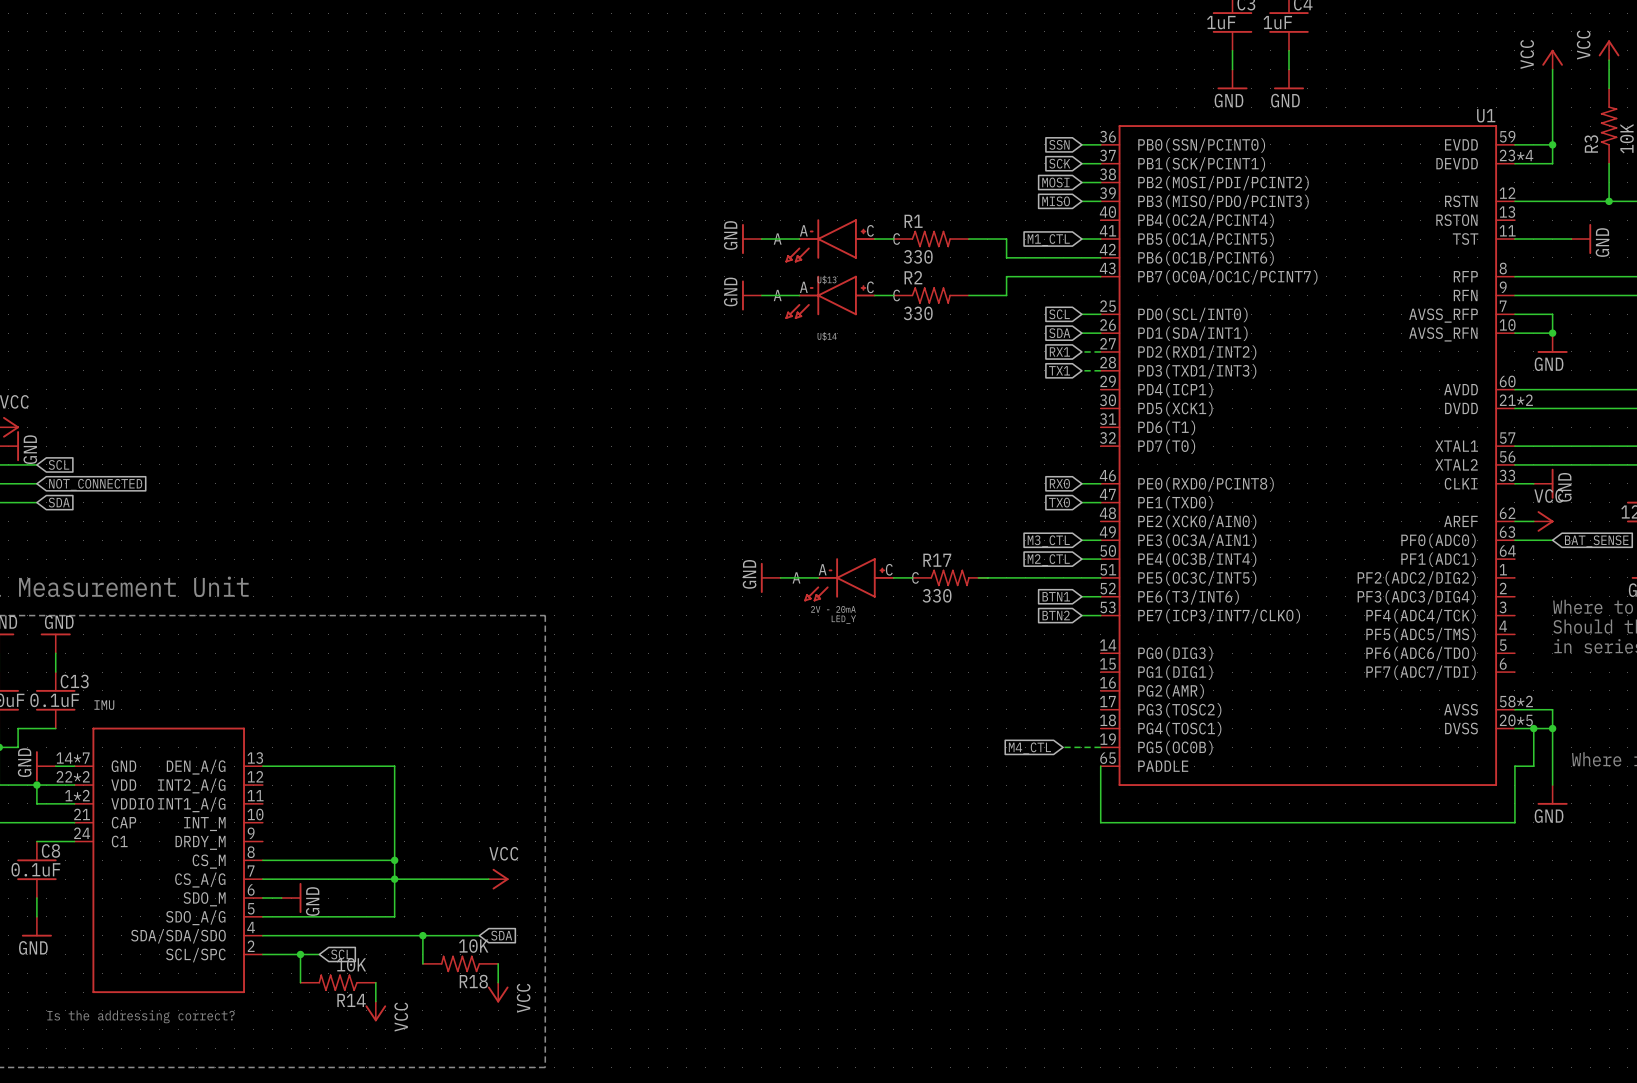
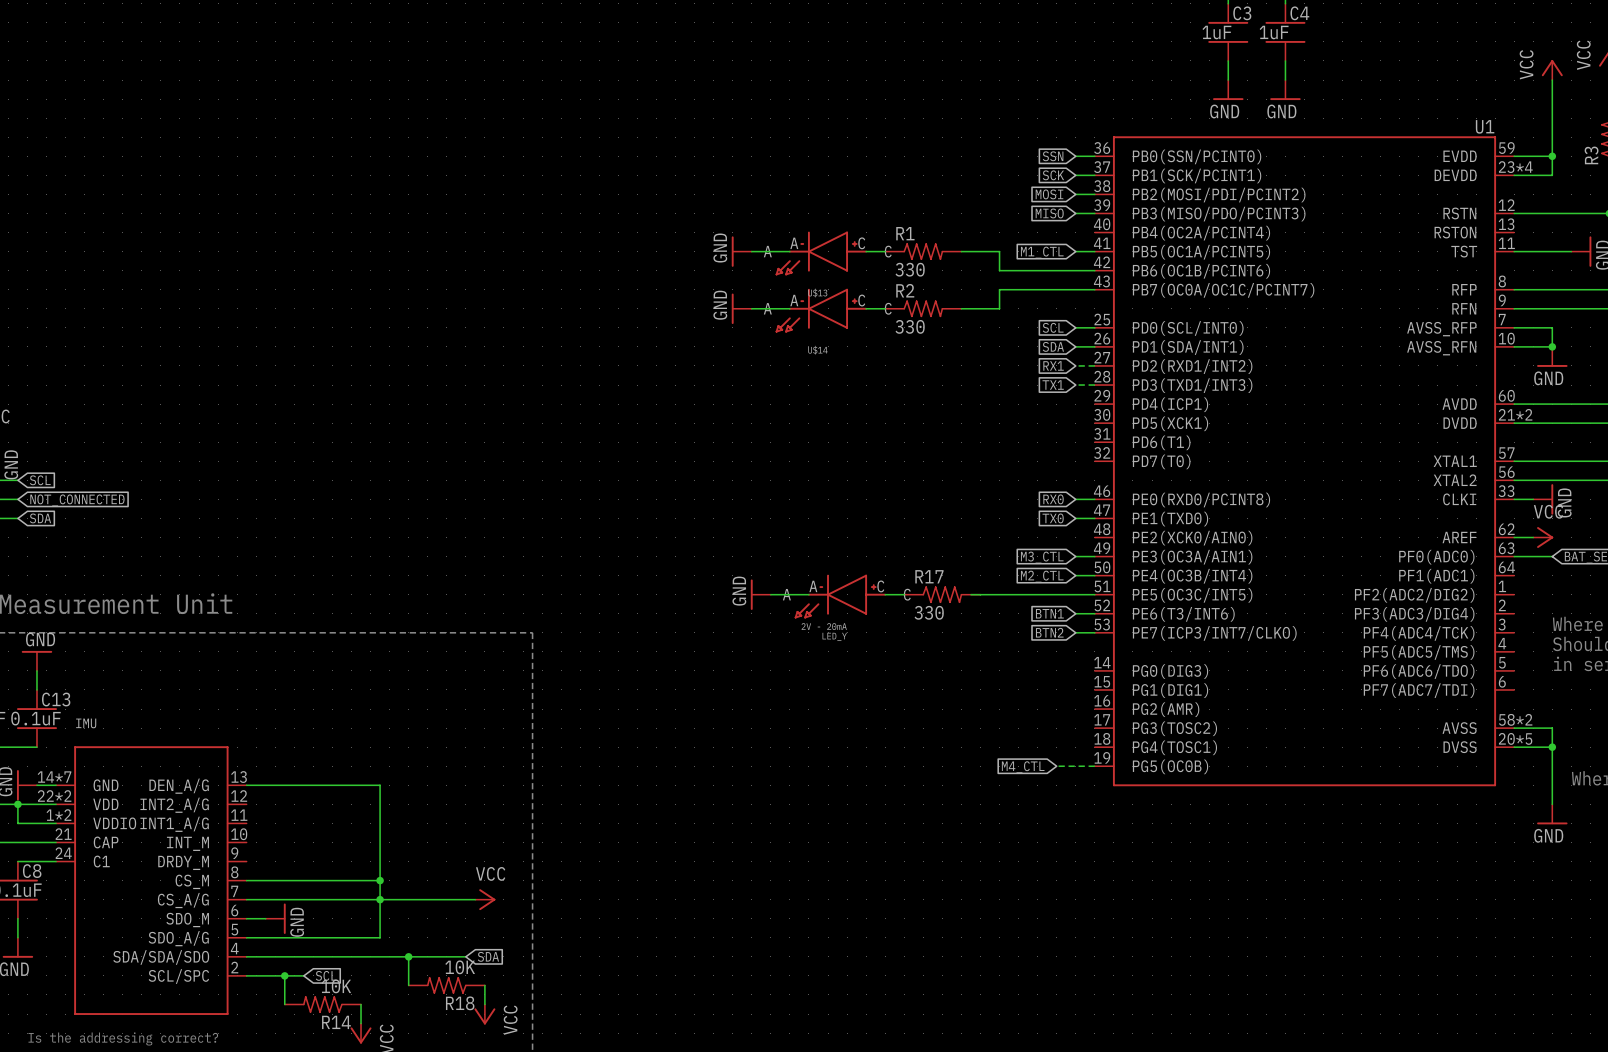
U1 symbol: [1100, 125, 1515, 786] -> [1094, 136, 1515, 787]
wire: (1533, 728) (1533, 766) (1514, 766) (1514, 822) (1100, 822) (1100, 766) -> none
junction: (1533, 728) -> none

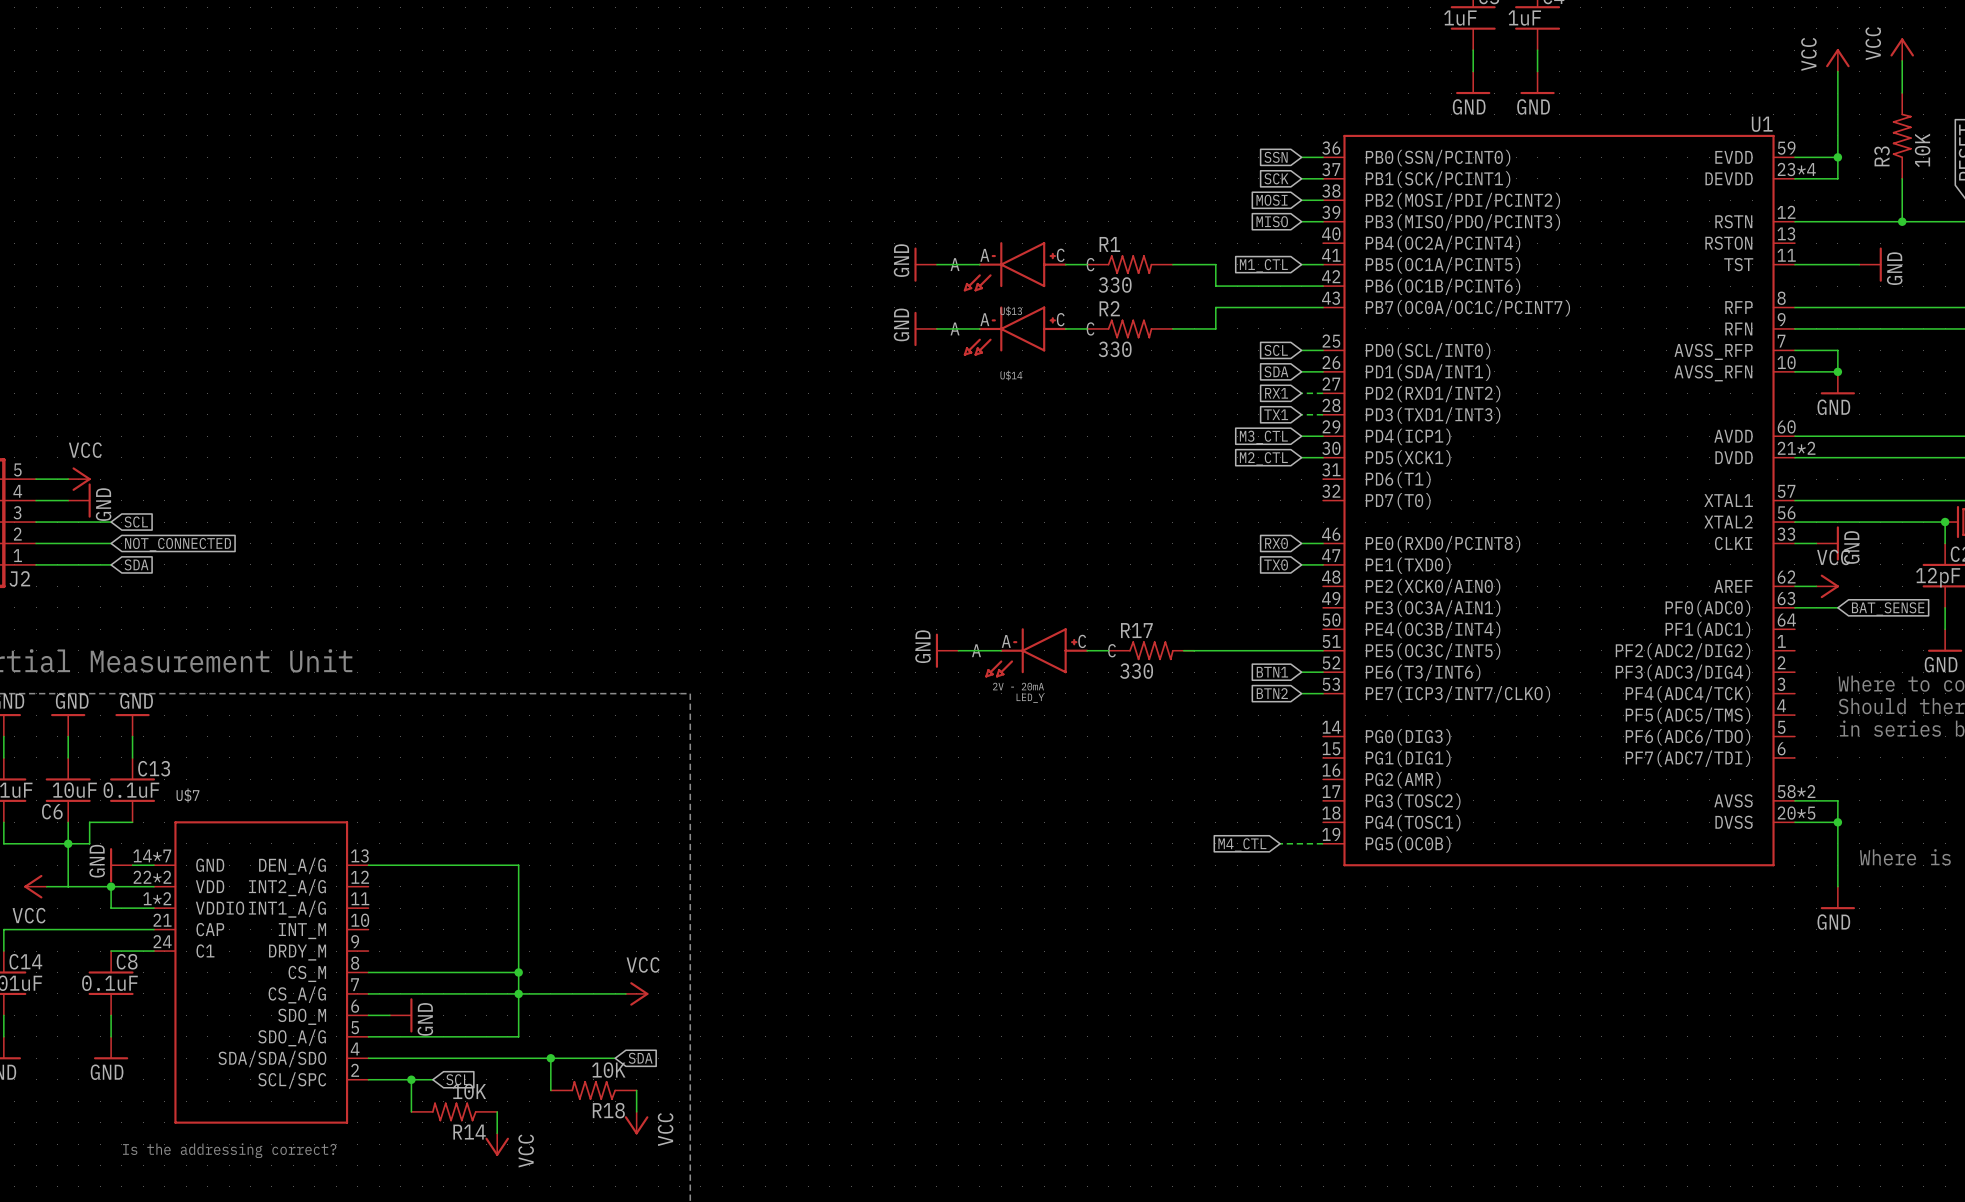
wire: (1075, 556) (1094, 556) -> (1301, 457) (1323, 457)
global label position: M3_CTL (1042, 557) -> M3_CTL (1263, 437)
wire: (1075, 575) (1094, 575) -> (1301, 436) (1323, 436)
global label position: M2_CTL (1042, 576) -> M2_CTL (1263, 458)
IMU name: IMU (86, 723) -> U$7 (187, 795)

